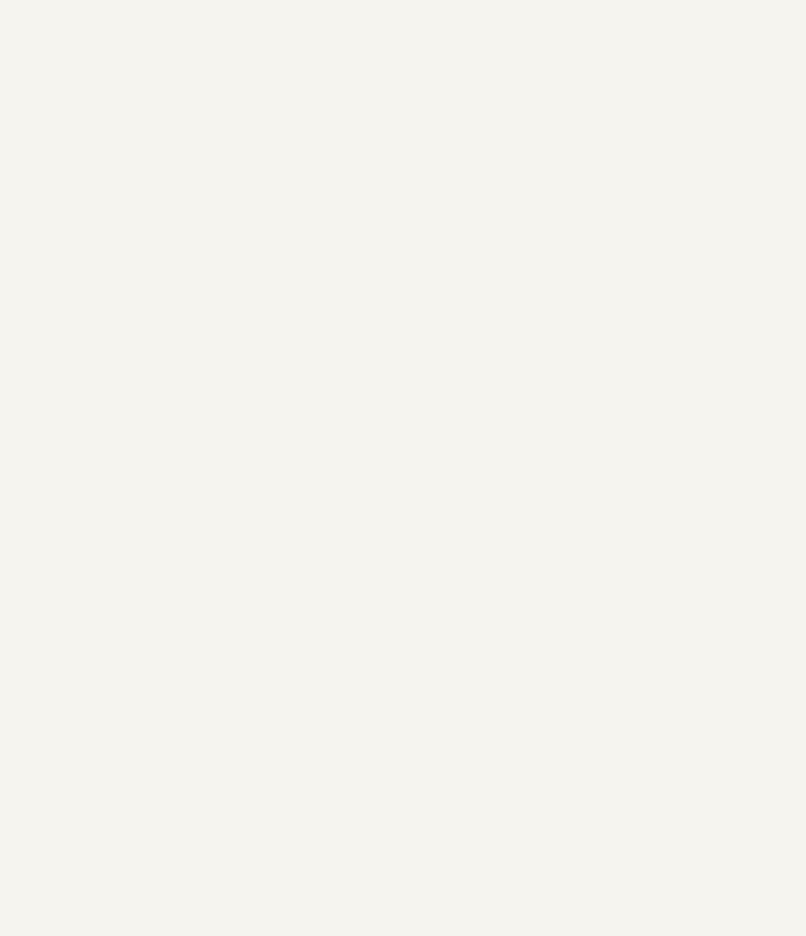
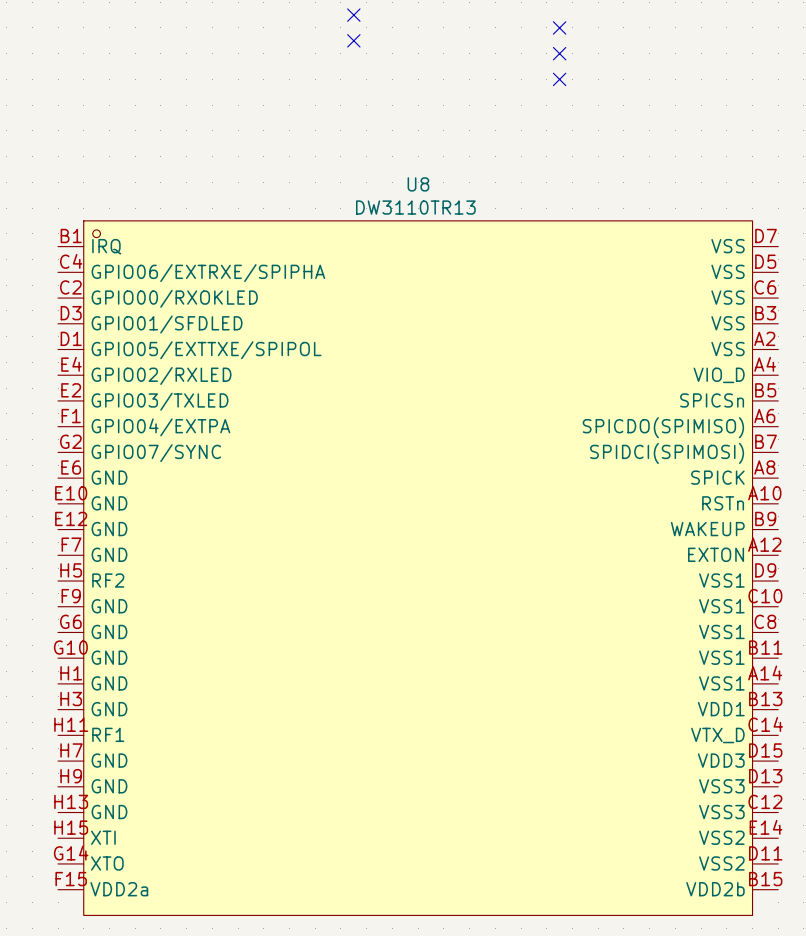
no-connect mark: none -> (353, 15)
no-connect mark: none -> (559, 27)
no-connect mark: none -> (353, 40)
no-connect mark: none -> (559, 53)
no-connect mark: none -> (559, 79)
U8: none -> DW3110TR13 (418, 568)

